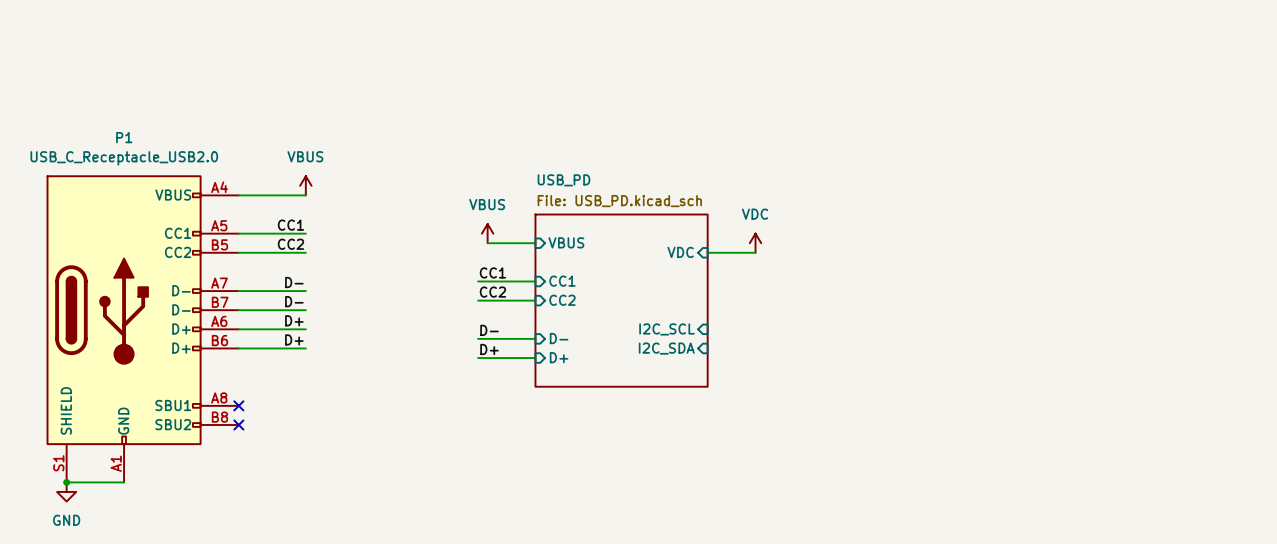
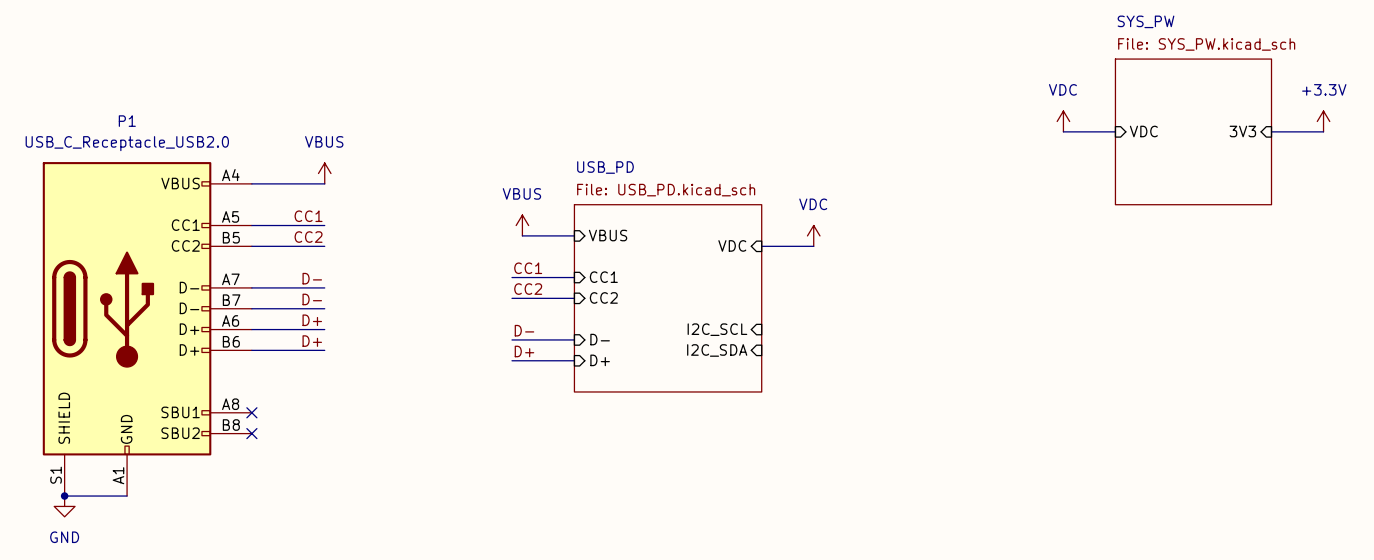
power symbol: none -> VDC (1063, 121)
power symbol: none -> +3.3V (1323, 121)
wire: none -> (1063, 131) (1115, 131)
sheet pin: none -> VDC (1143, 131)
sheet SYS_PW: none -> File: SYS_PW.kicad_sch (1193, 131)
sheet pin: none -> 3V3 (1242, 131)
wire: none -> (1271, 131) (1323, 131)

